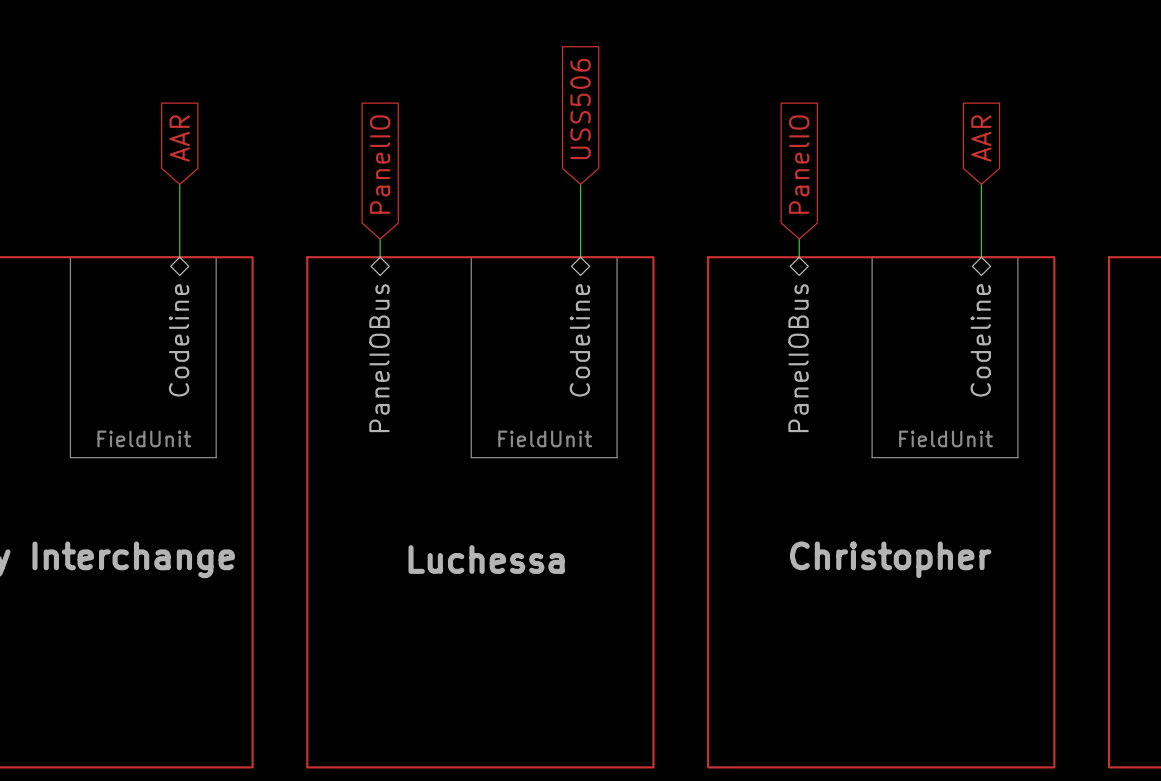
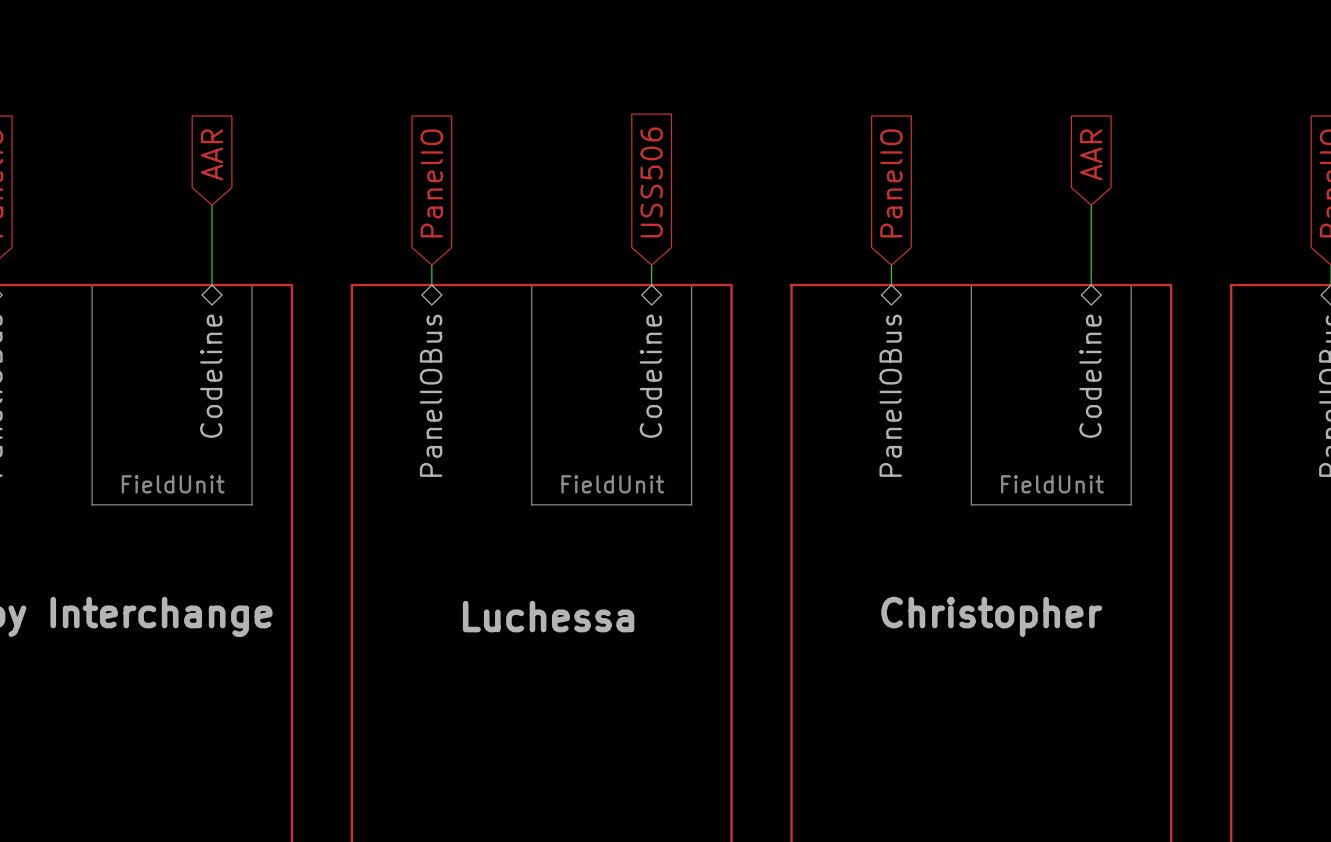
global label position: USS506 (580, 109) -> USS506 (651, 182)
wire: (580, 184) (580, 239) -> none

